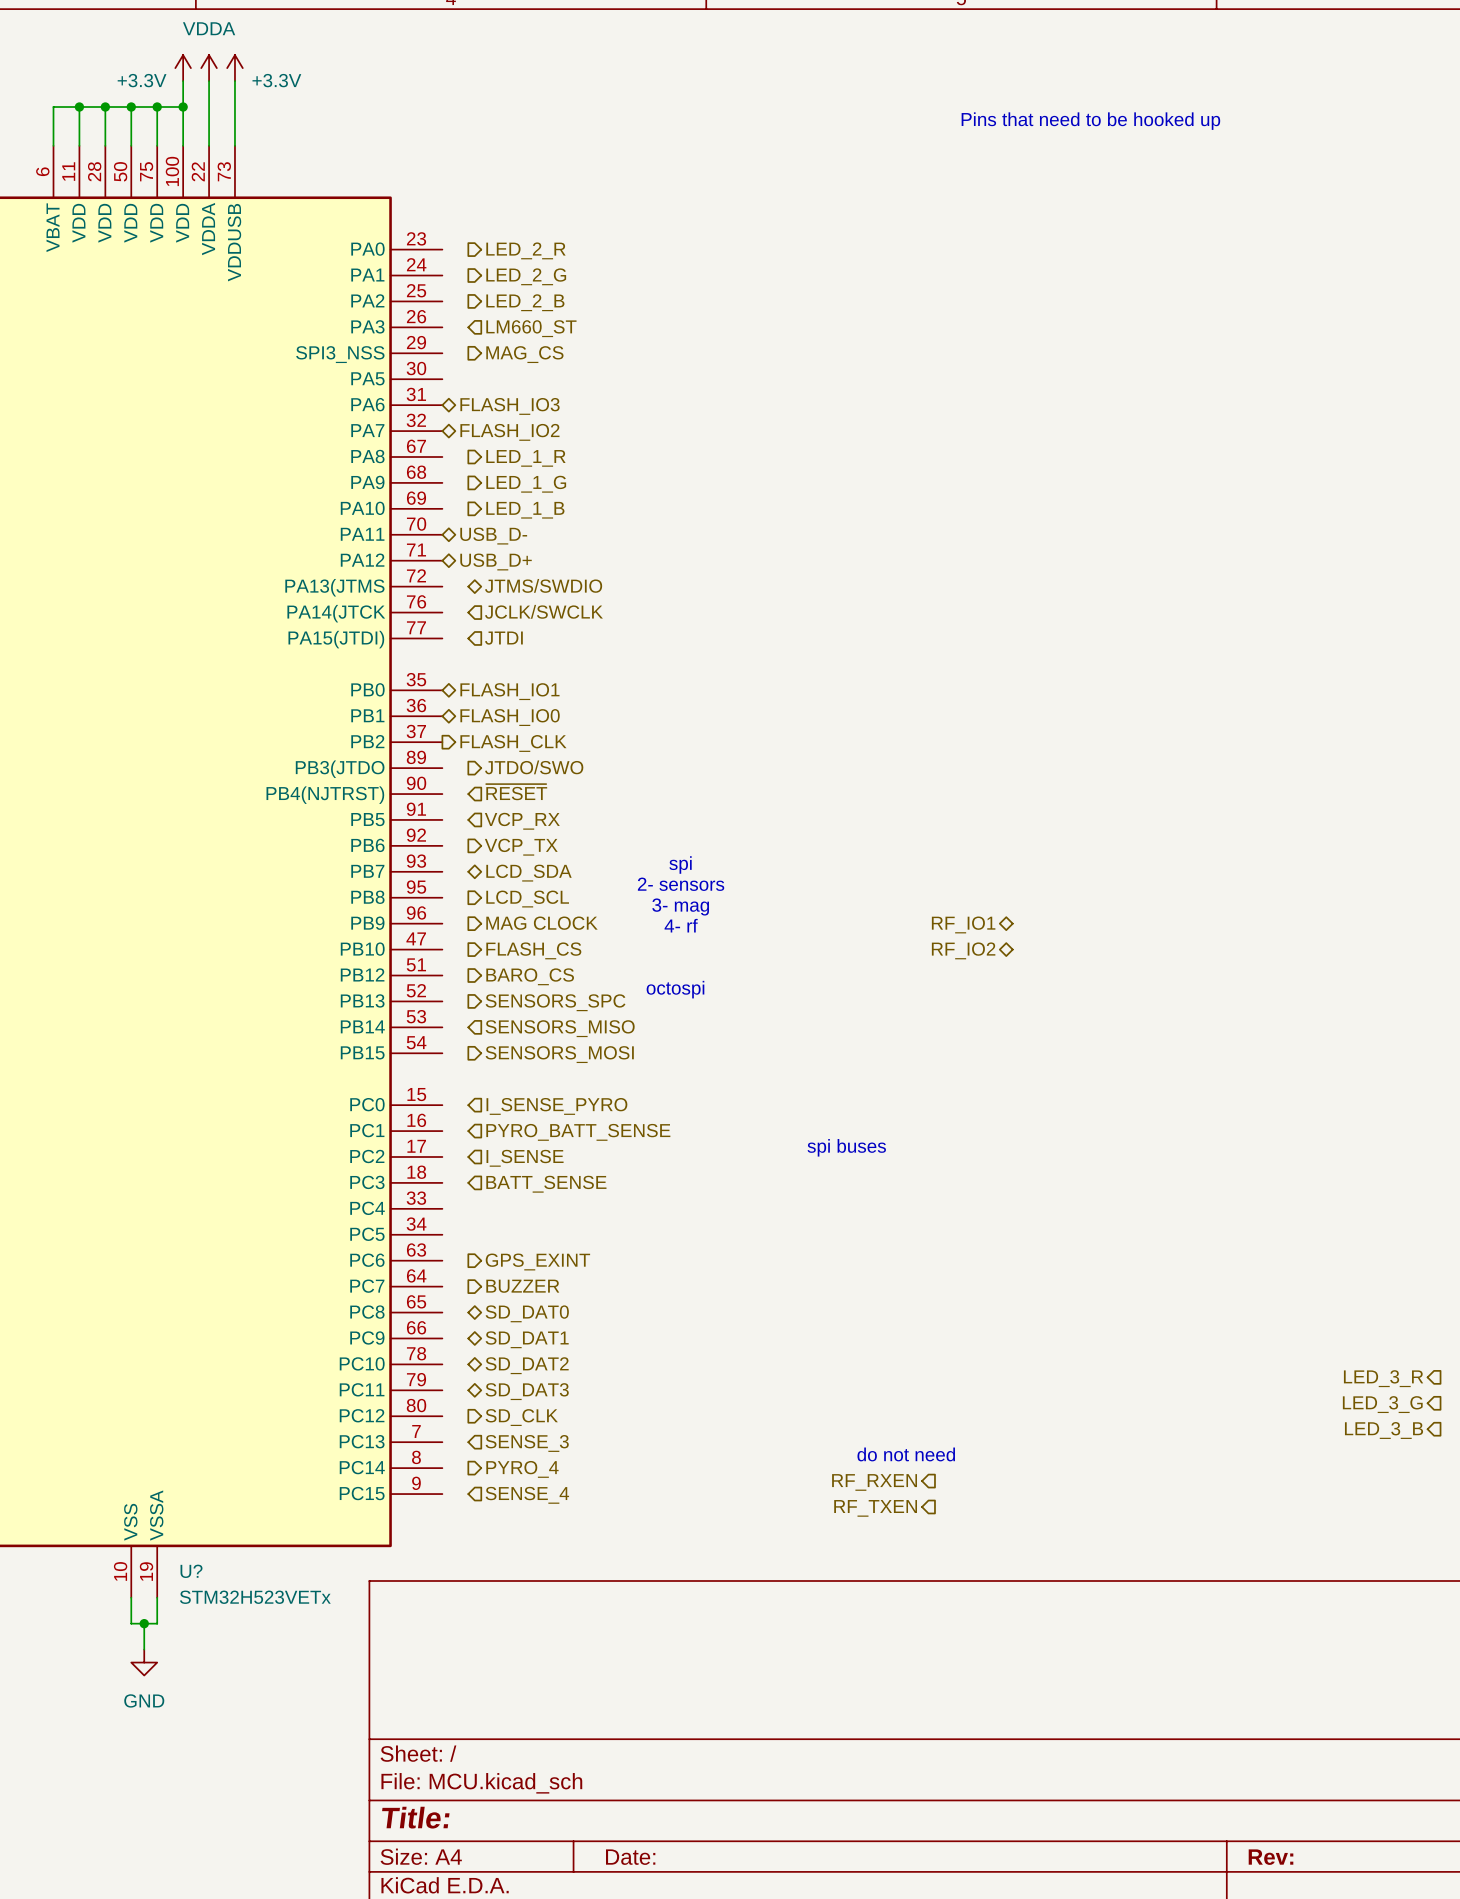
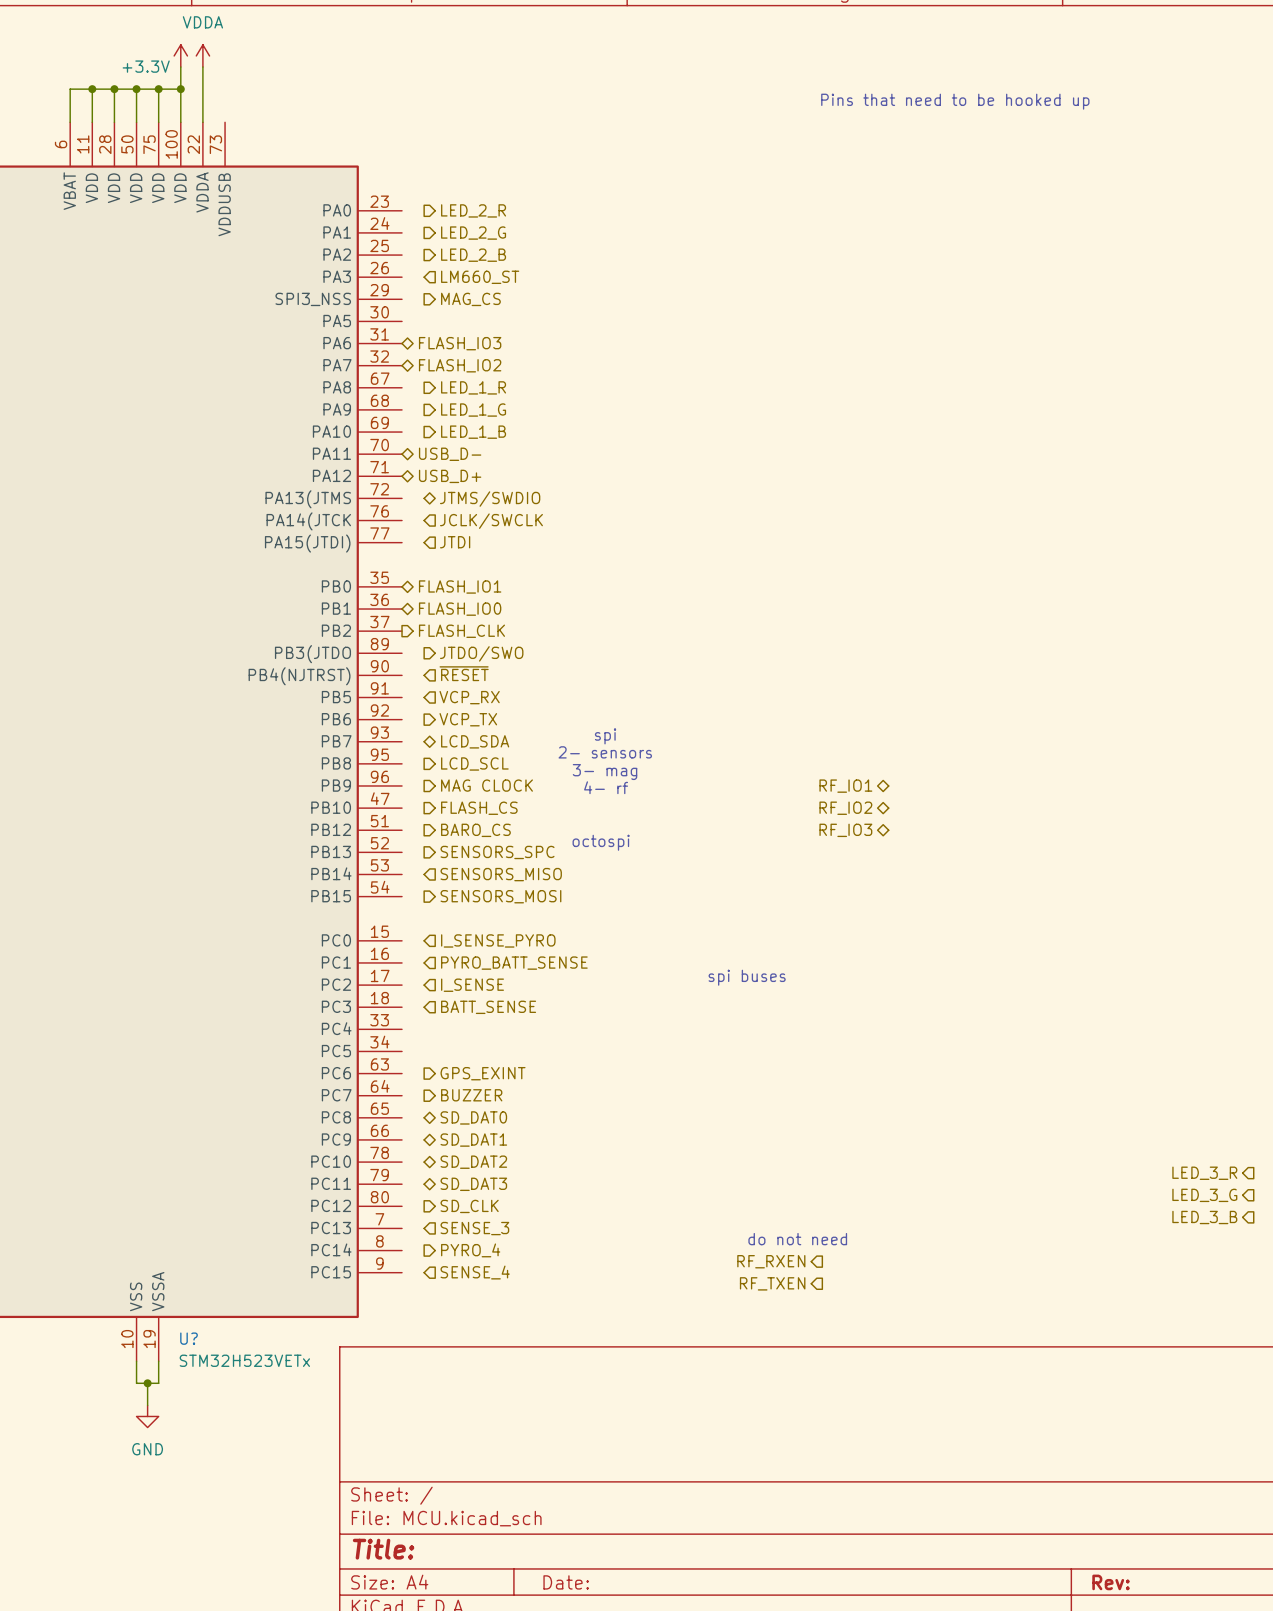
power symbol: +3.3V (234, 68) -> none
wire: (234, 81) (234, 145) -> none
hierarchical label: none -> RF_IO3 (845, 830)

